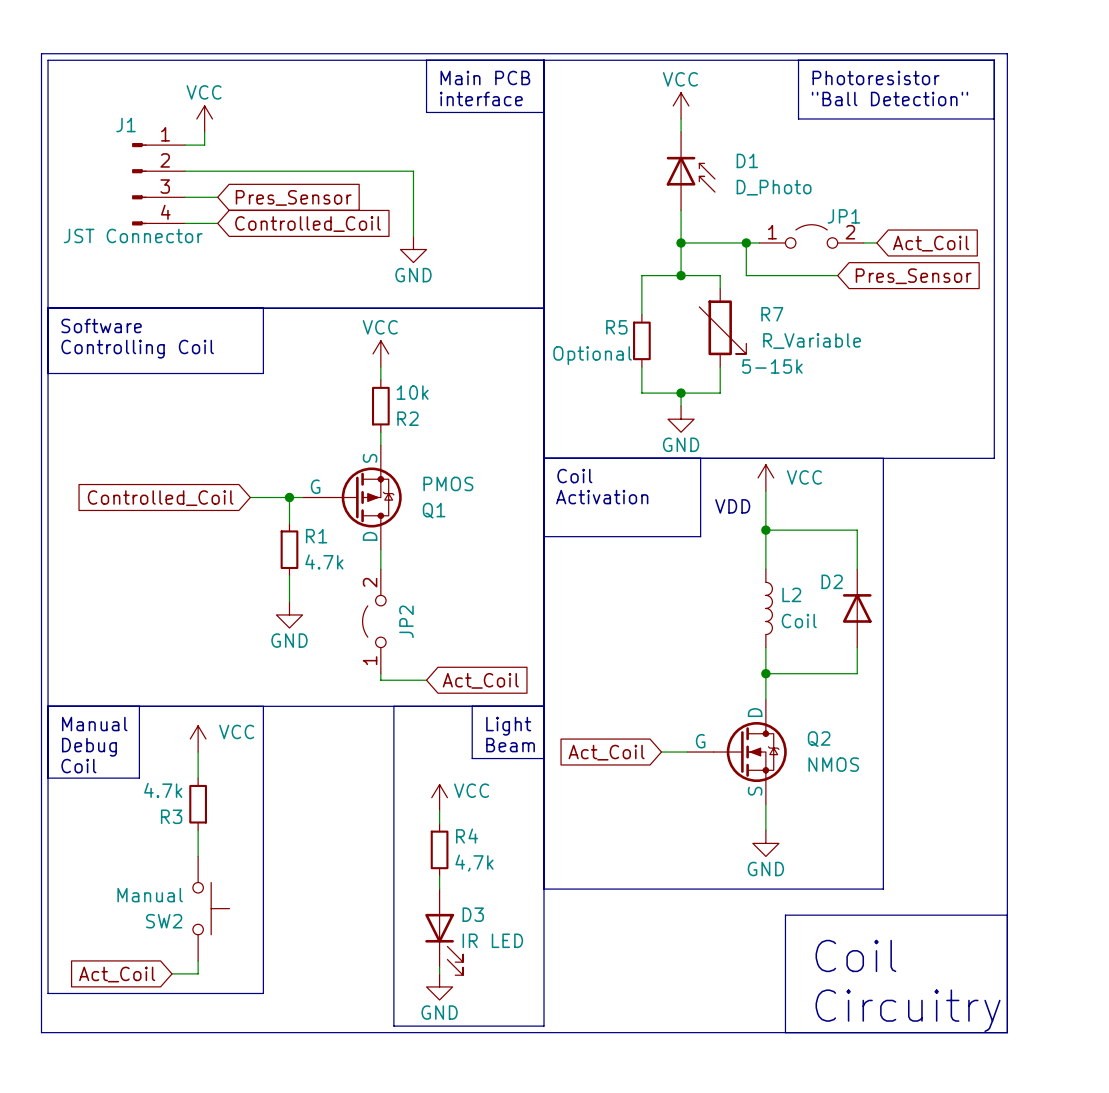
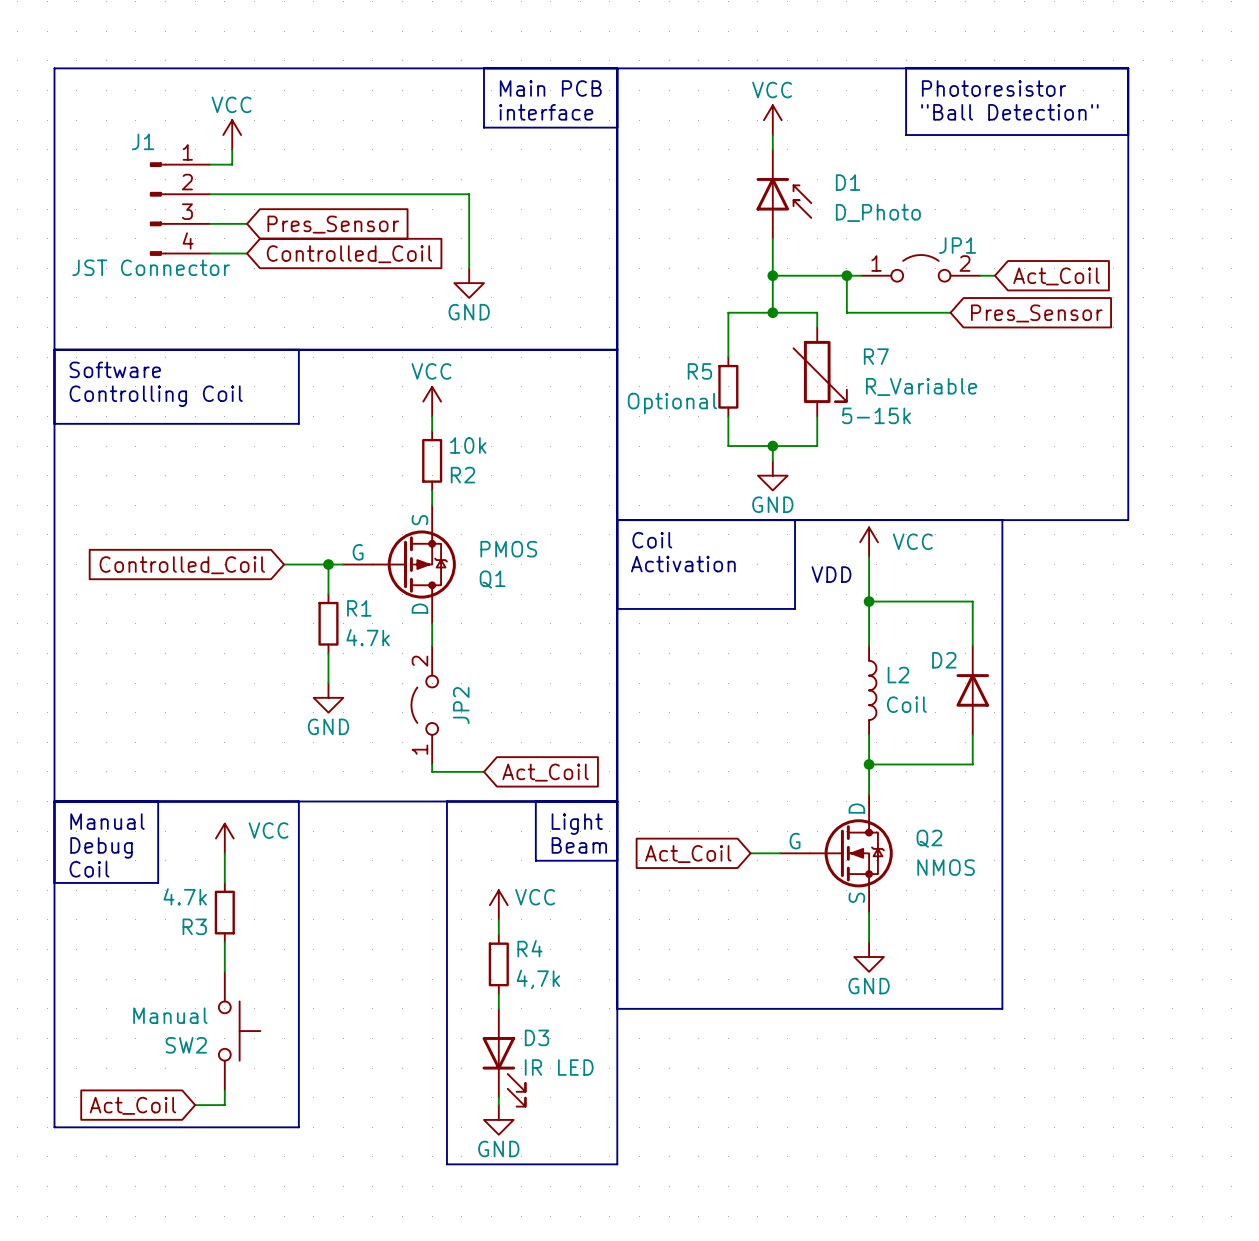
line: (41, 53) (1007, 53) (1007, 1032) (41, 1032) (41, 53) -> none
line: (1007, 915) (785, 915) (785, 1032) -> none
text: Coil (855, 955) -> none
text: Circuitry (908, 1010) -> none

